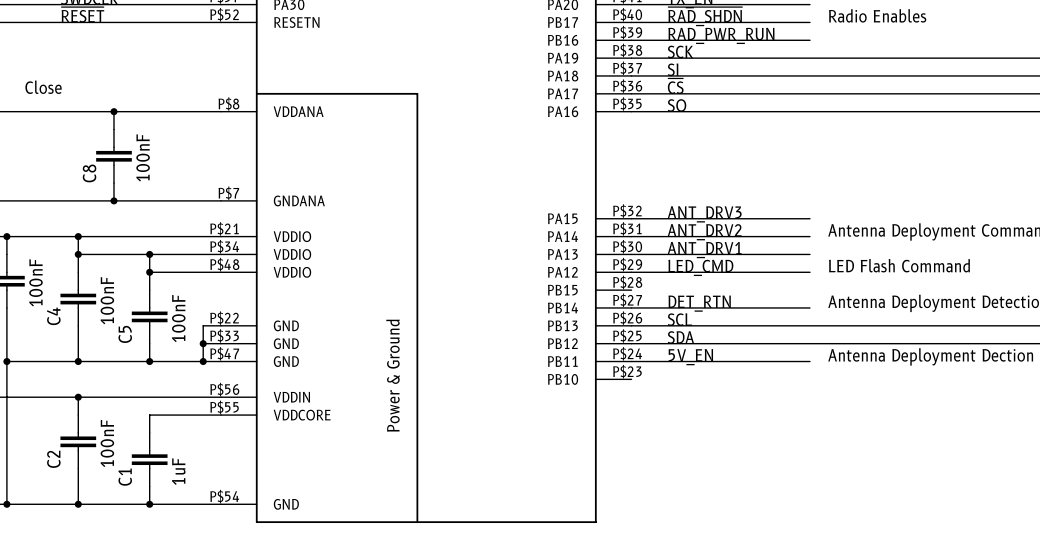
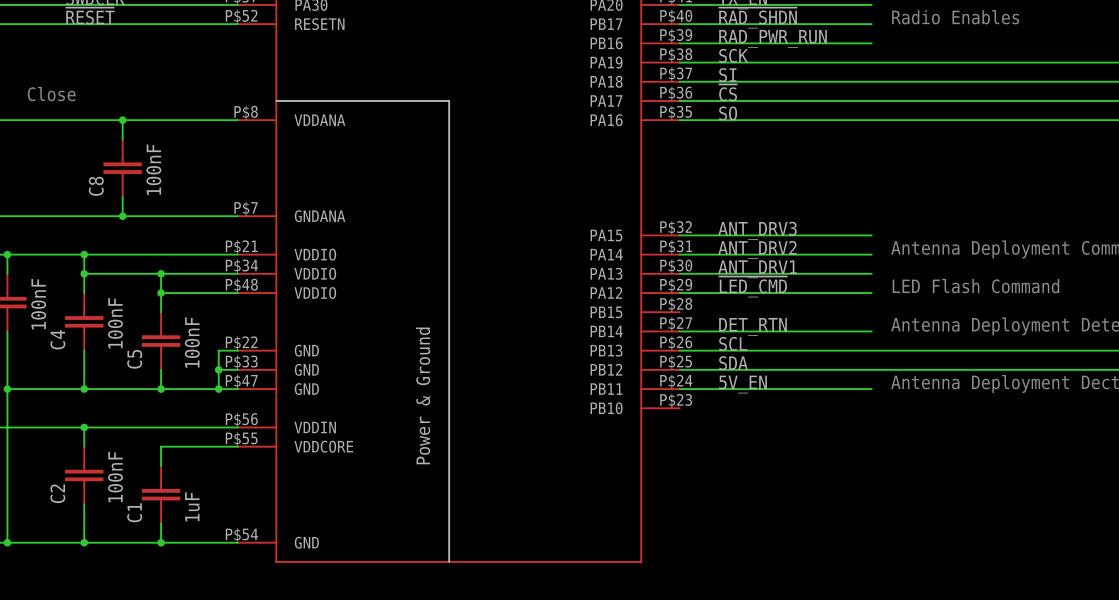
label: LED_CMD (700, 267) -> ~{LED_CMD} (753, 286)

